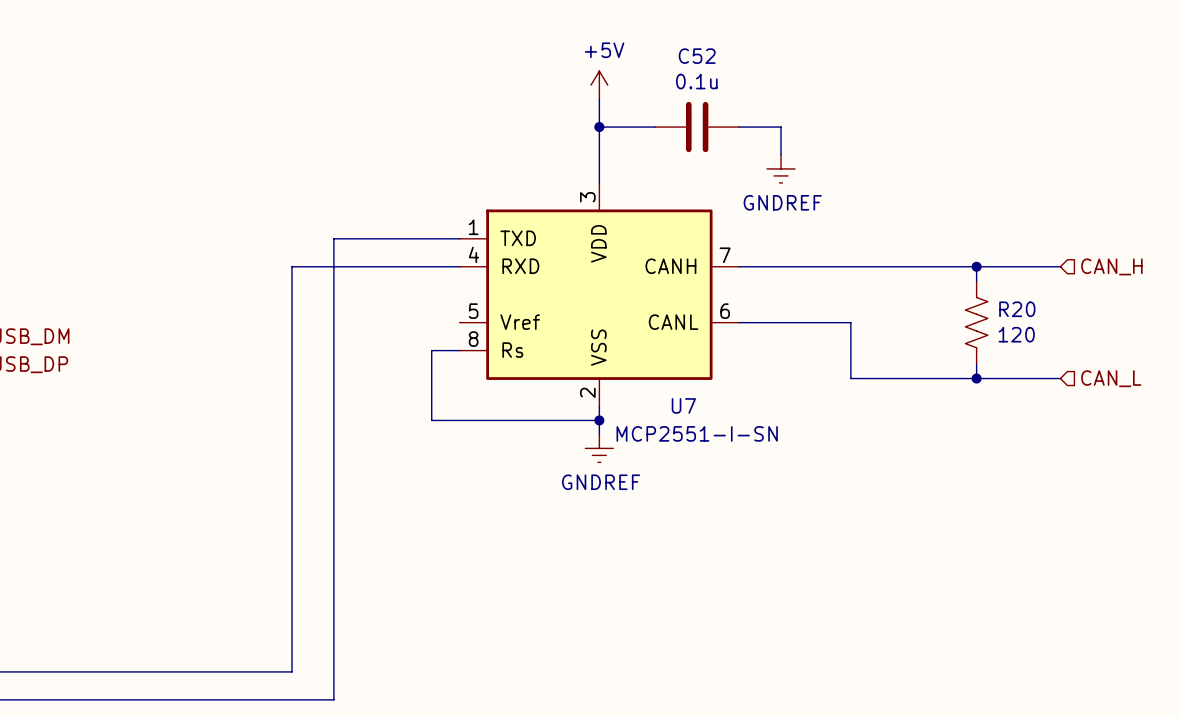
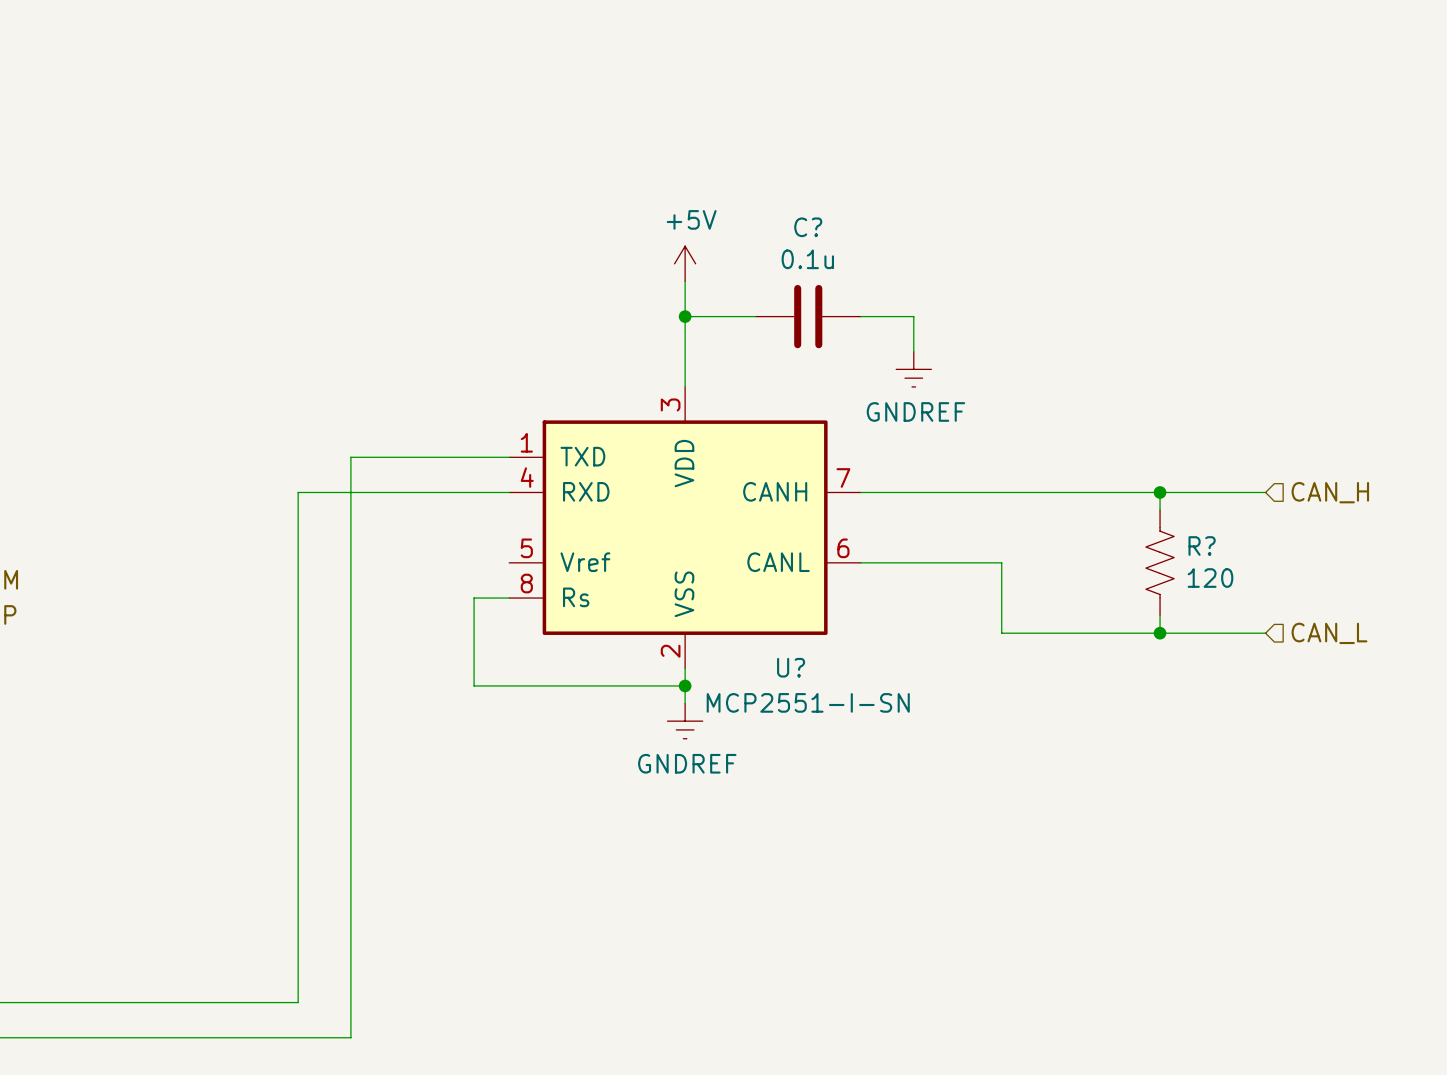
C52 name: C52 (697, 56) -> C? (808, 227)
R20 name: R20 (1017, 309) -> R? (1202, 546)
U7 name: U7 (683, 405) -> U? (791, 667)

